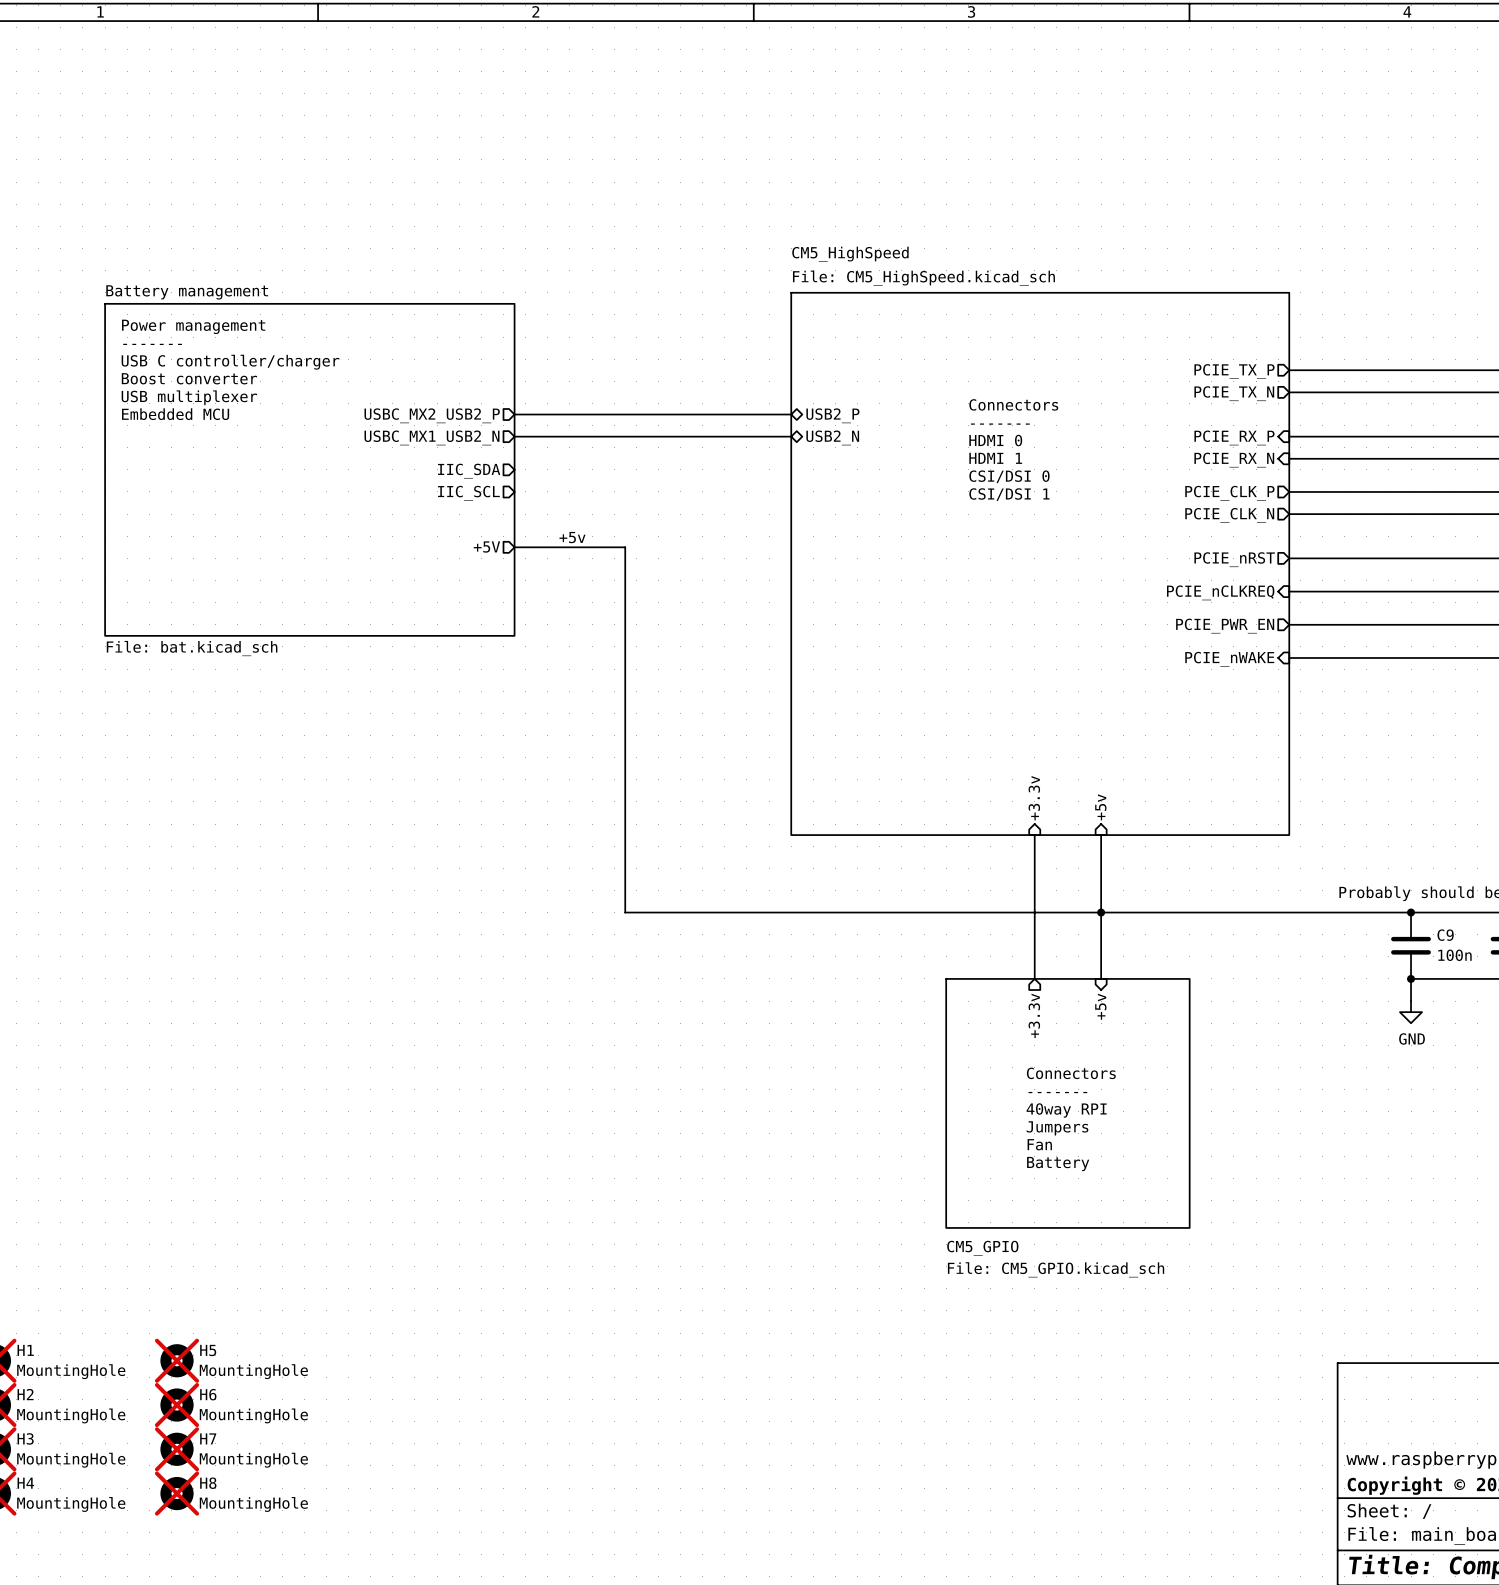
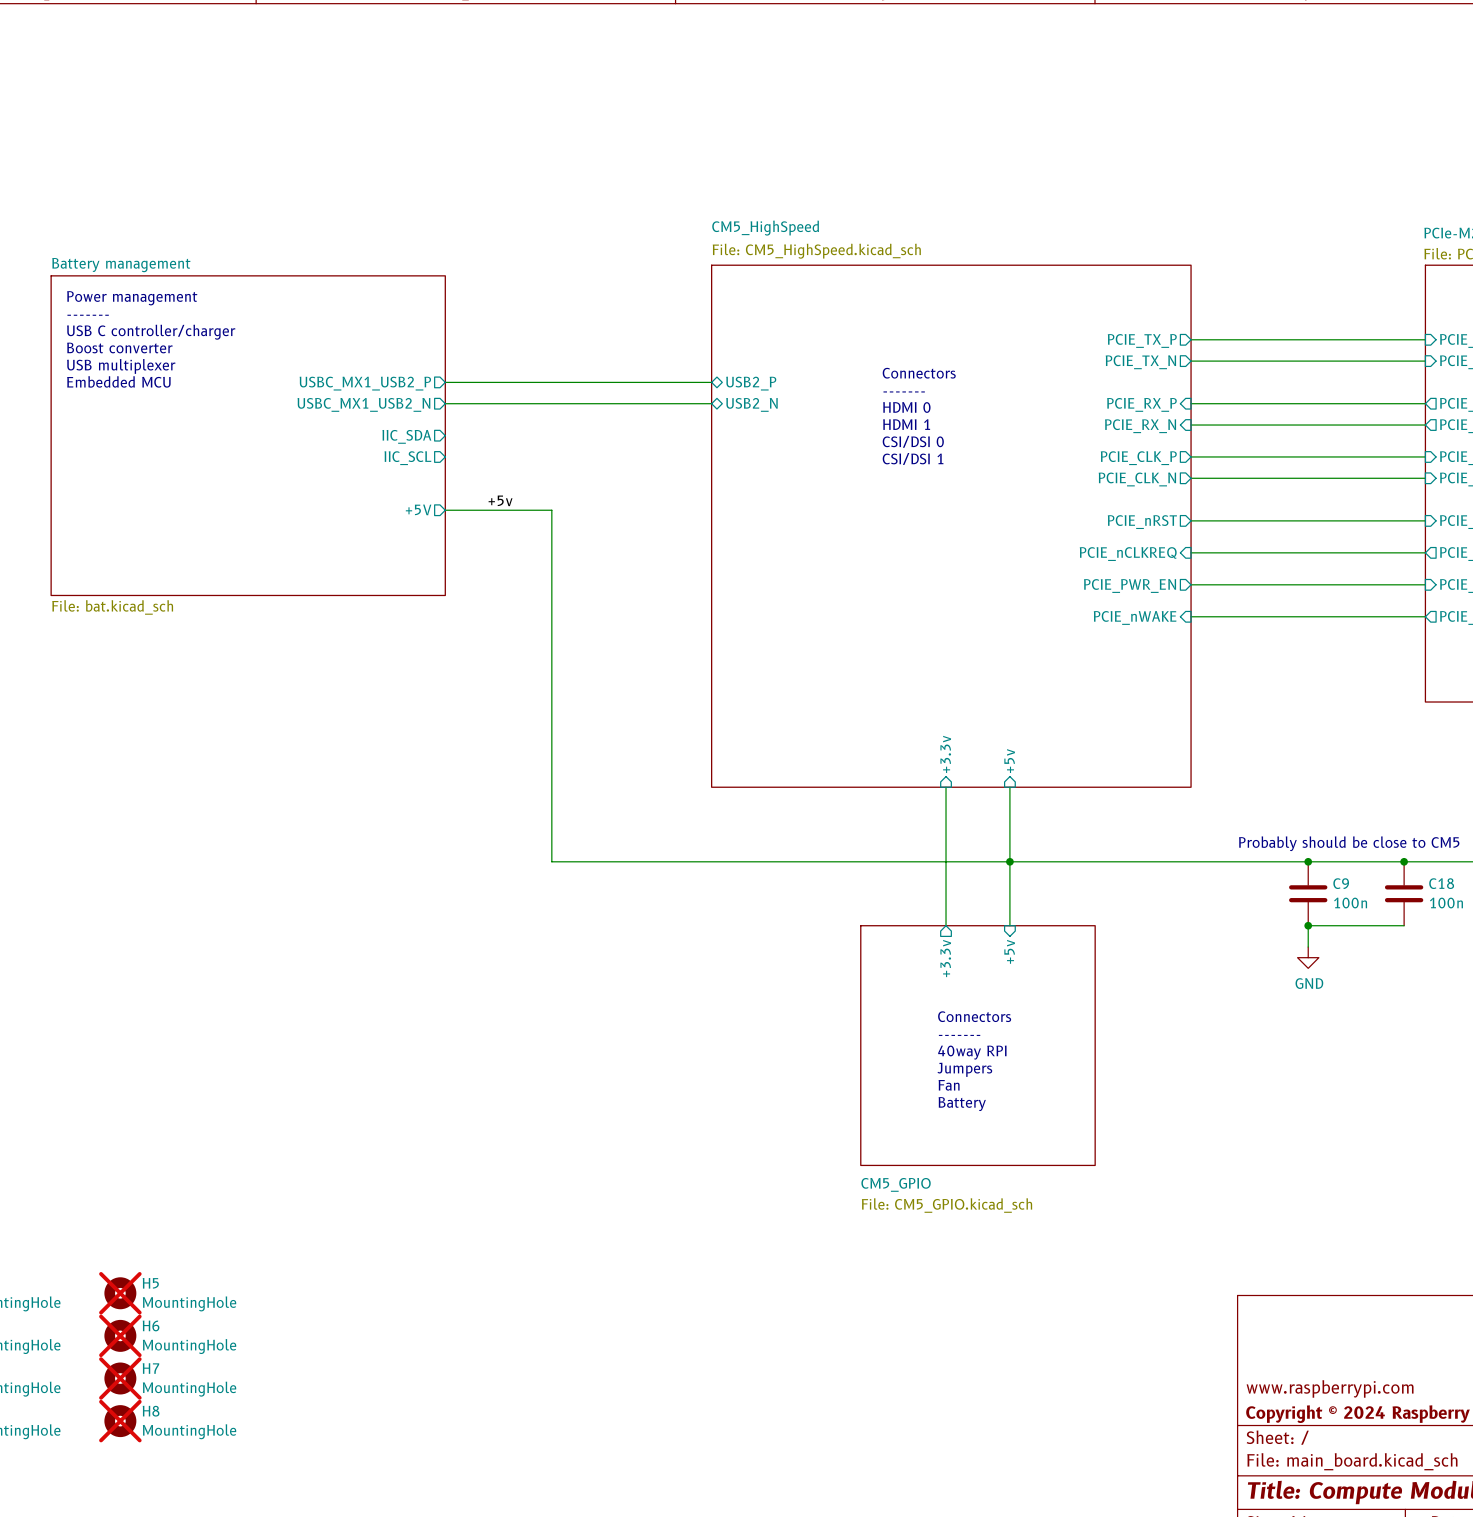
sheet pin: USBC_MX2_USB2_P (432, 415) -> USBC_MX1_USB2_P (365, 383)

